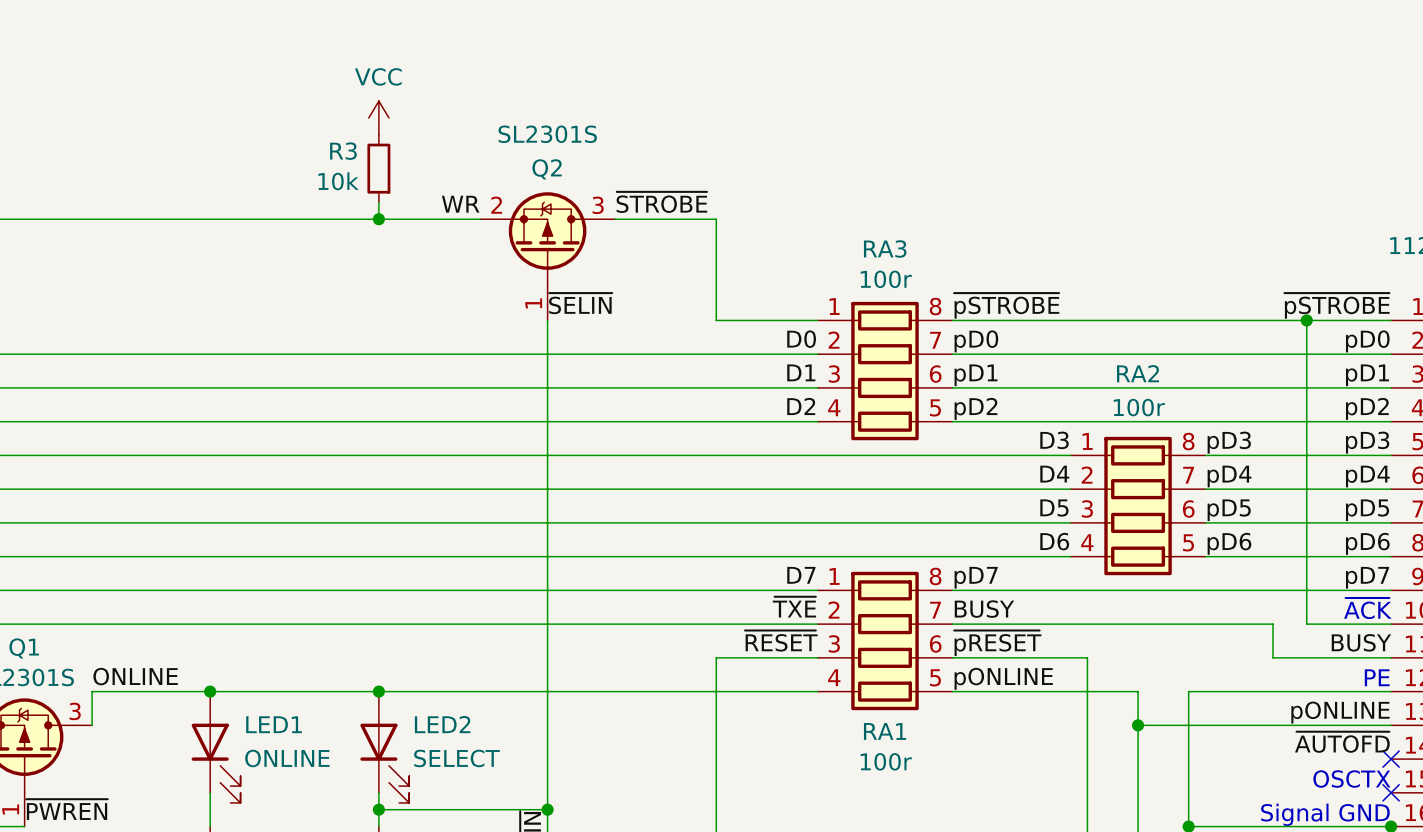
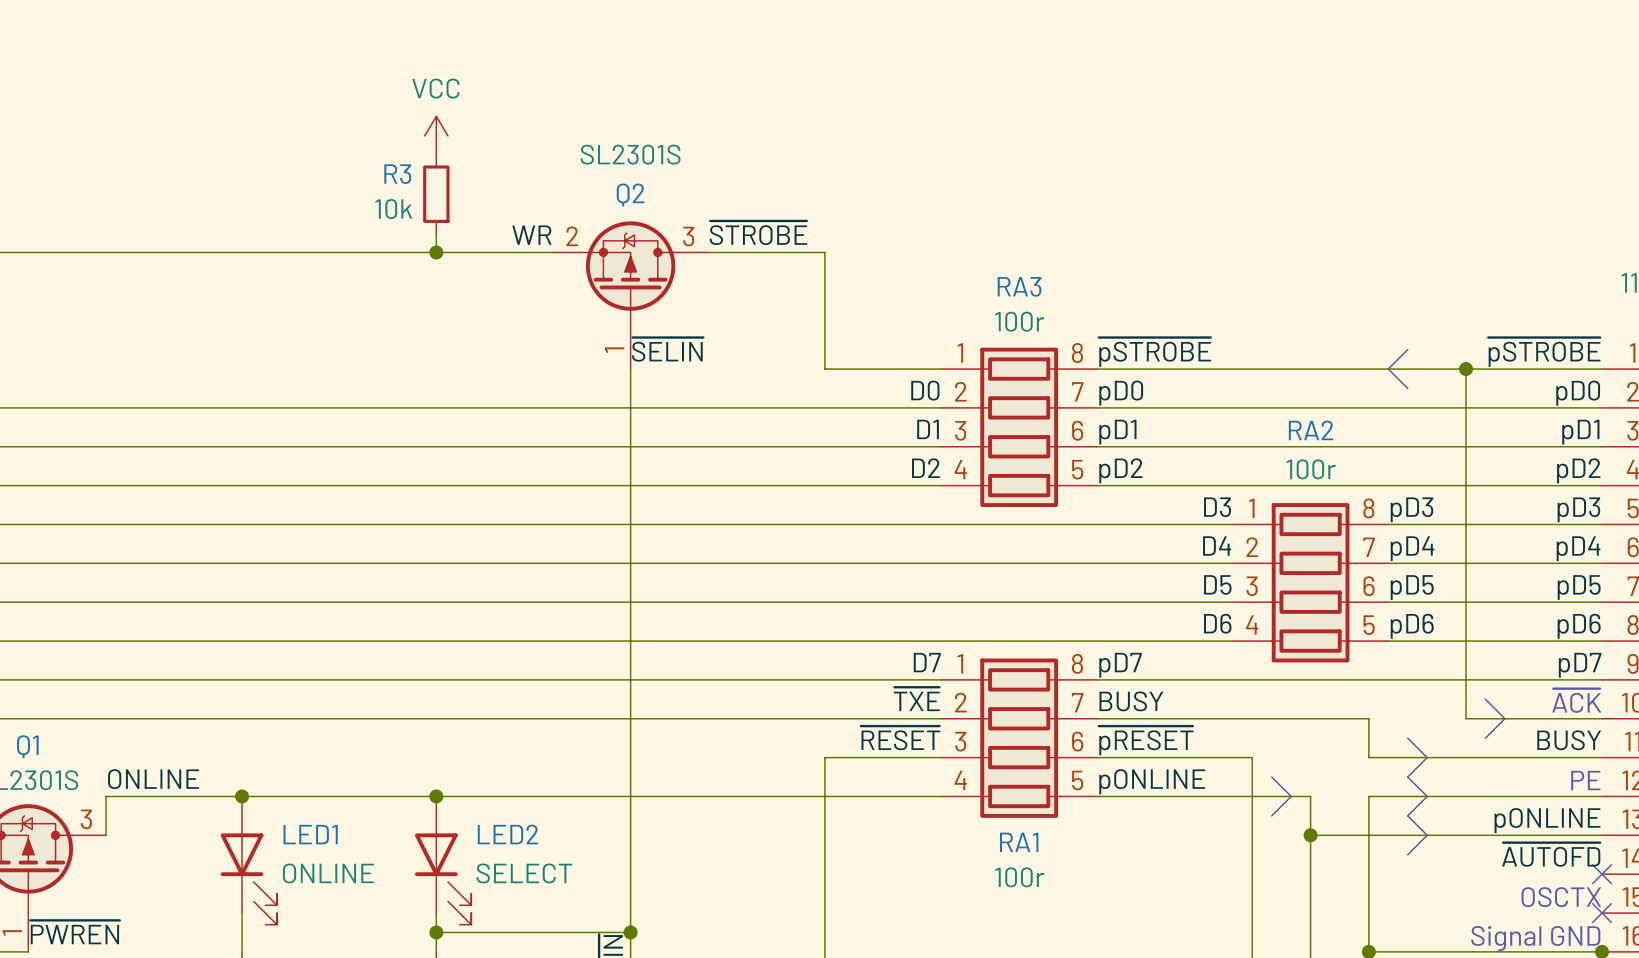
line: none -> (1407, 349) (1388, 369) (1407, 388)
wire: (1306, 320) (1306, 624) -> (1466, 369) (1466, 718) (1504, 718)
junction position: (1306, 320) -> (1466, 369)
line: none -> (1485, 699) (1504, 718) (1485, 738)
wire: (1188, 624) (1273, 624) (1273, 657) -> (1368, 718) (1368, 757) (1466, 757)
line: none -> (1407, 738) (1427, 757) (1407, 777) (1427, 796) (1407, 815) (1427, 835) (1407, 854)
line: none -> (1271, 777) (1291, 796) (1271, 815)

